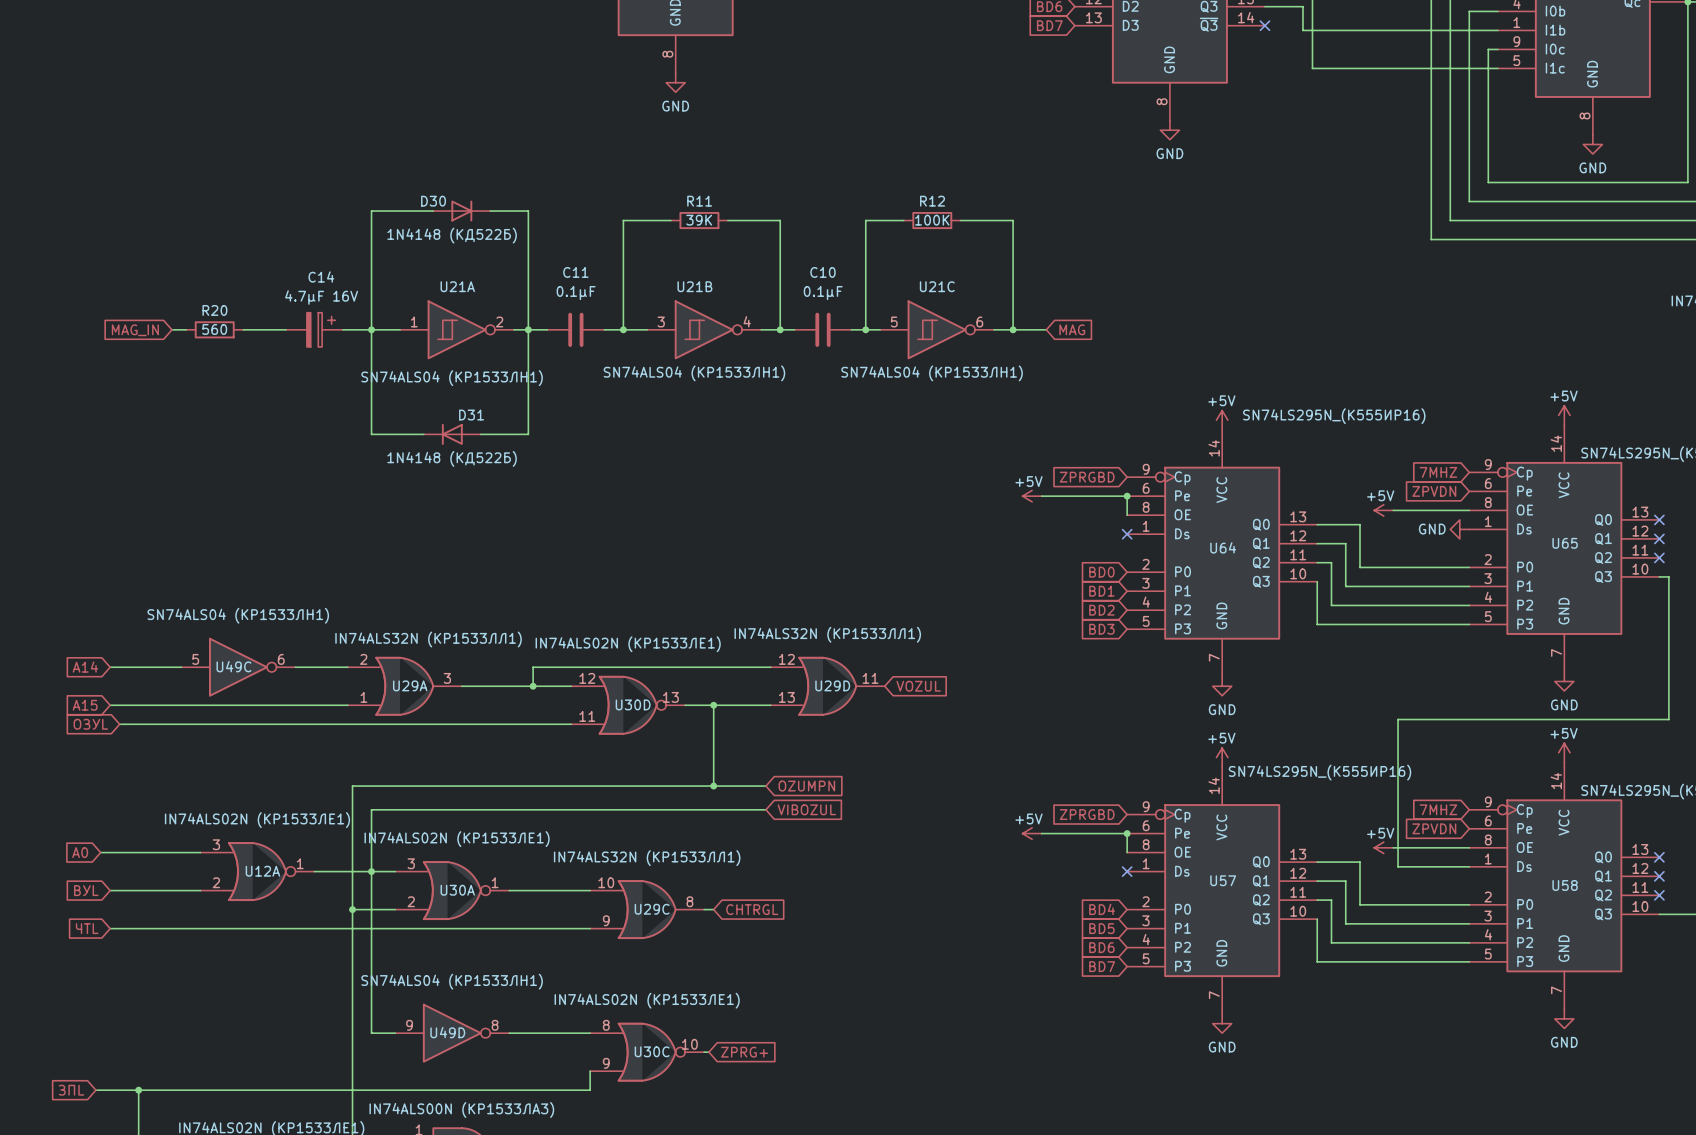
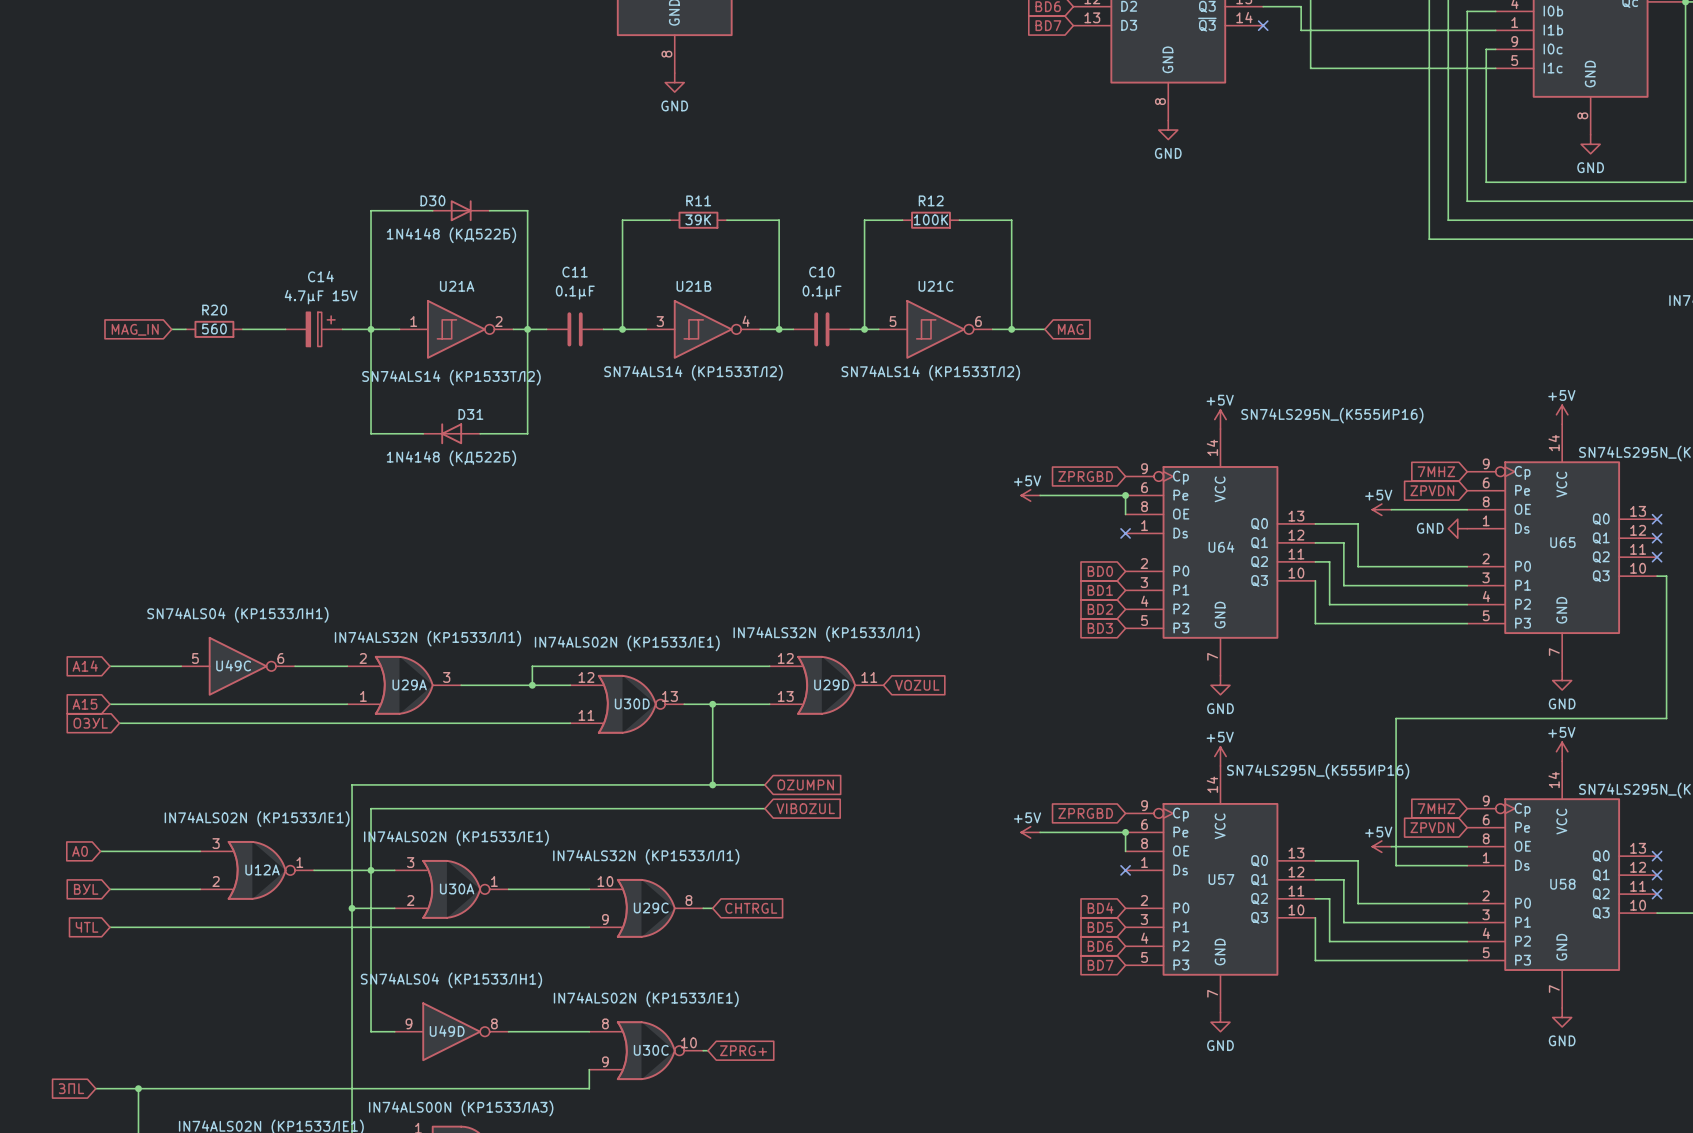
C14 value: 4.7µF 16V (321, 297) -> 4.7µF 15V (321, 297)
U21B value: SN74ALS04 (КР1533ЛН1) (694, 373) -> SN74ALS14 (КР1533ТЛ2) (693, 372)
U21C value: SN74ALS04 (КР1533ЛН1) (932, 373) -> SN74ALS14 (КР1533ТЛ2) (930, 372)
U21A value: SN74ALS04 (КР1533ЛН1) (452, 378) -> SN74ALS14 (КР1533ТЛ2) (451, 377)

